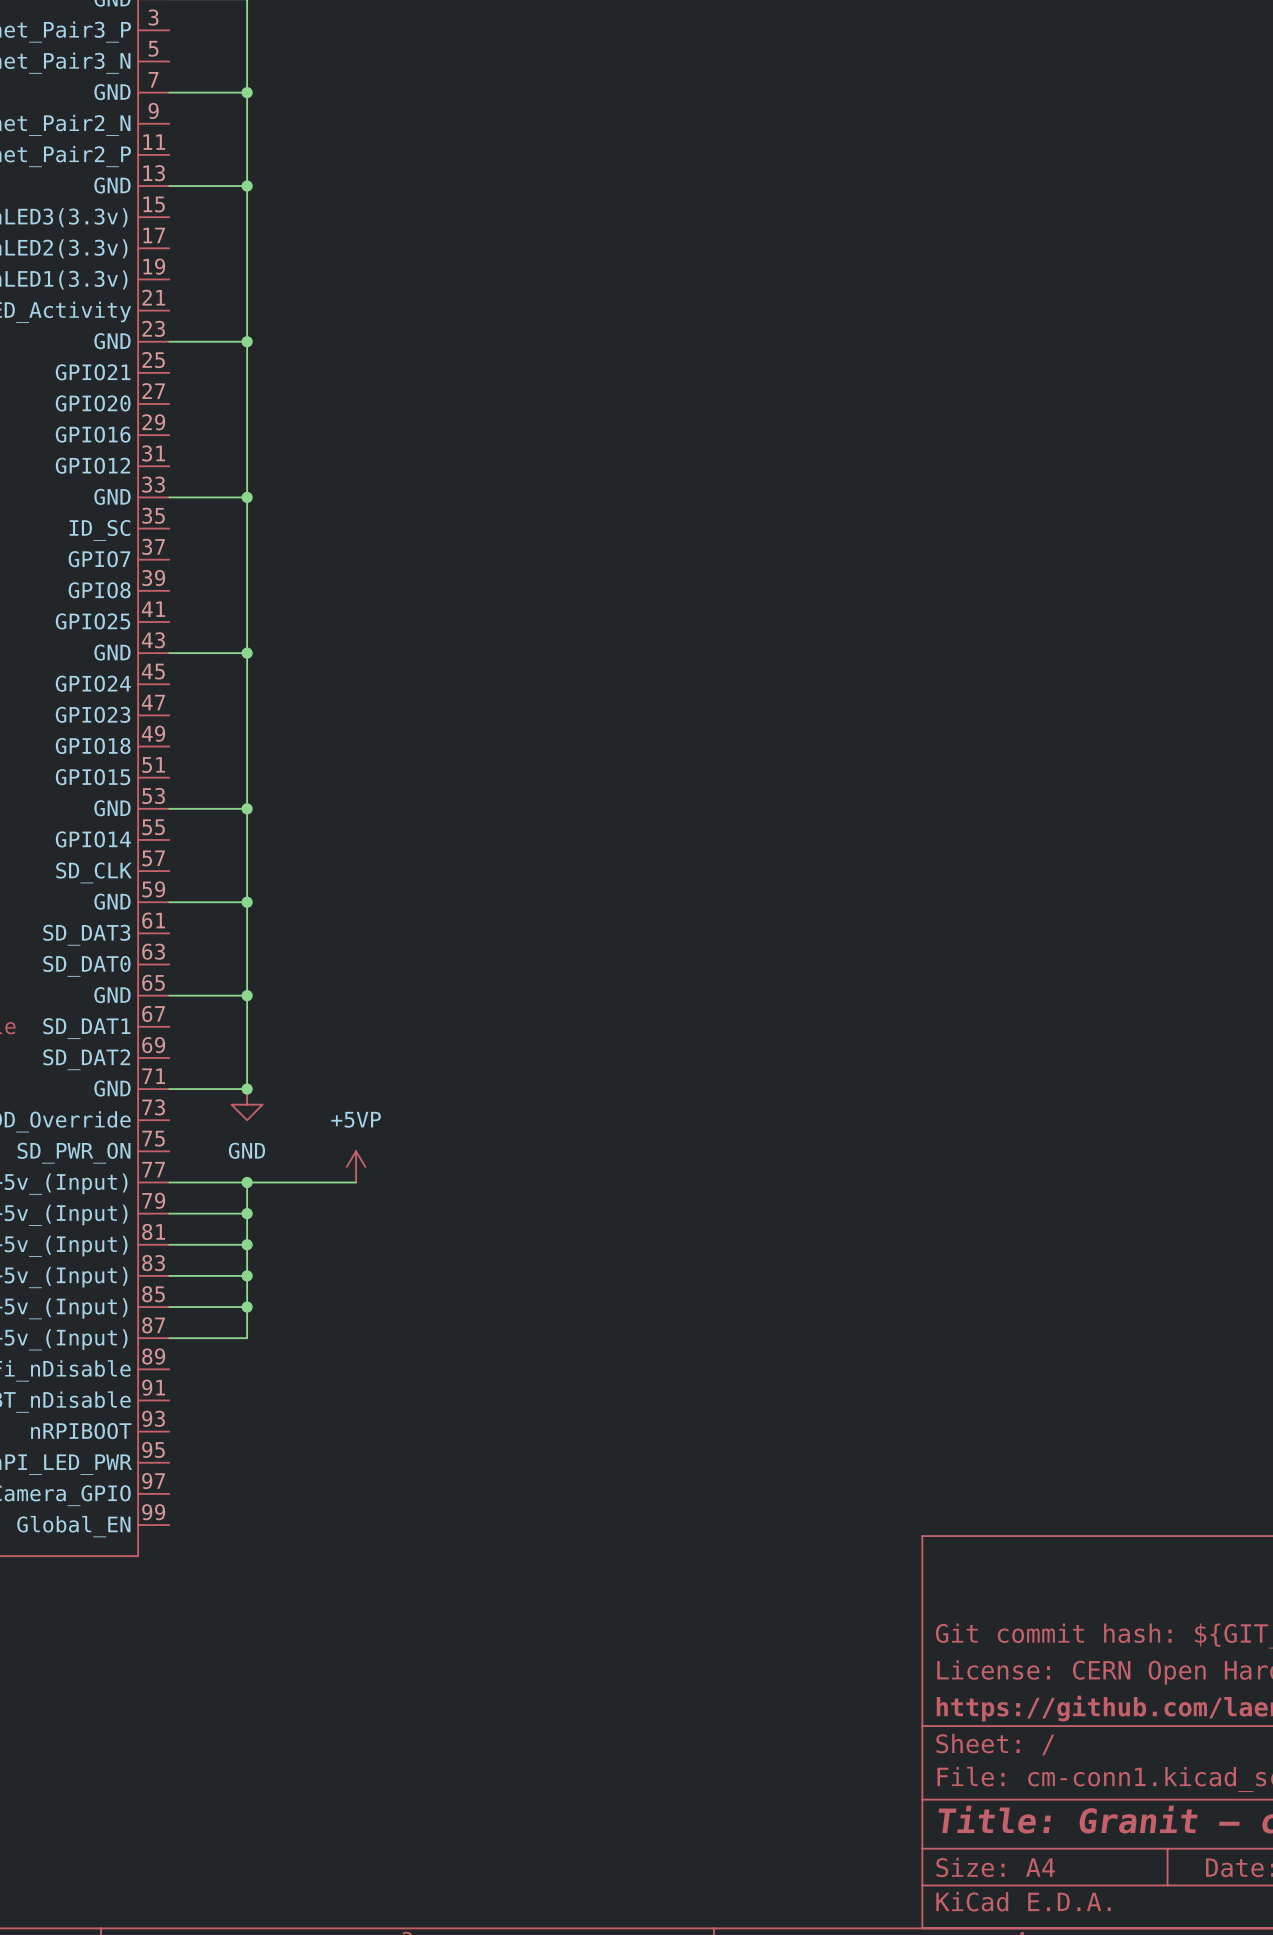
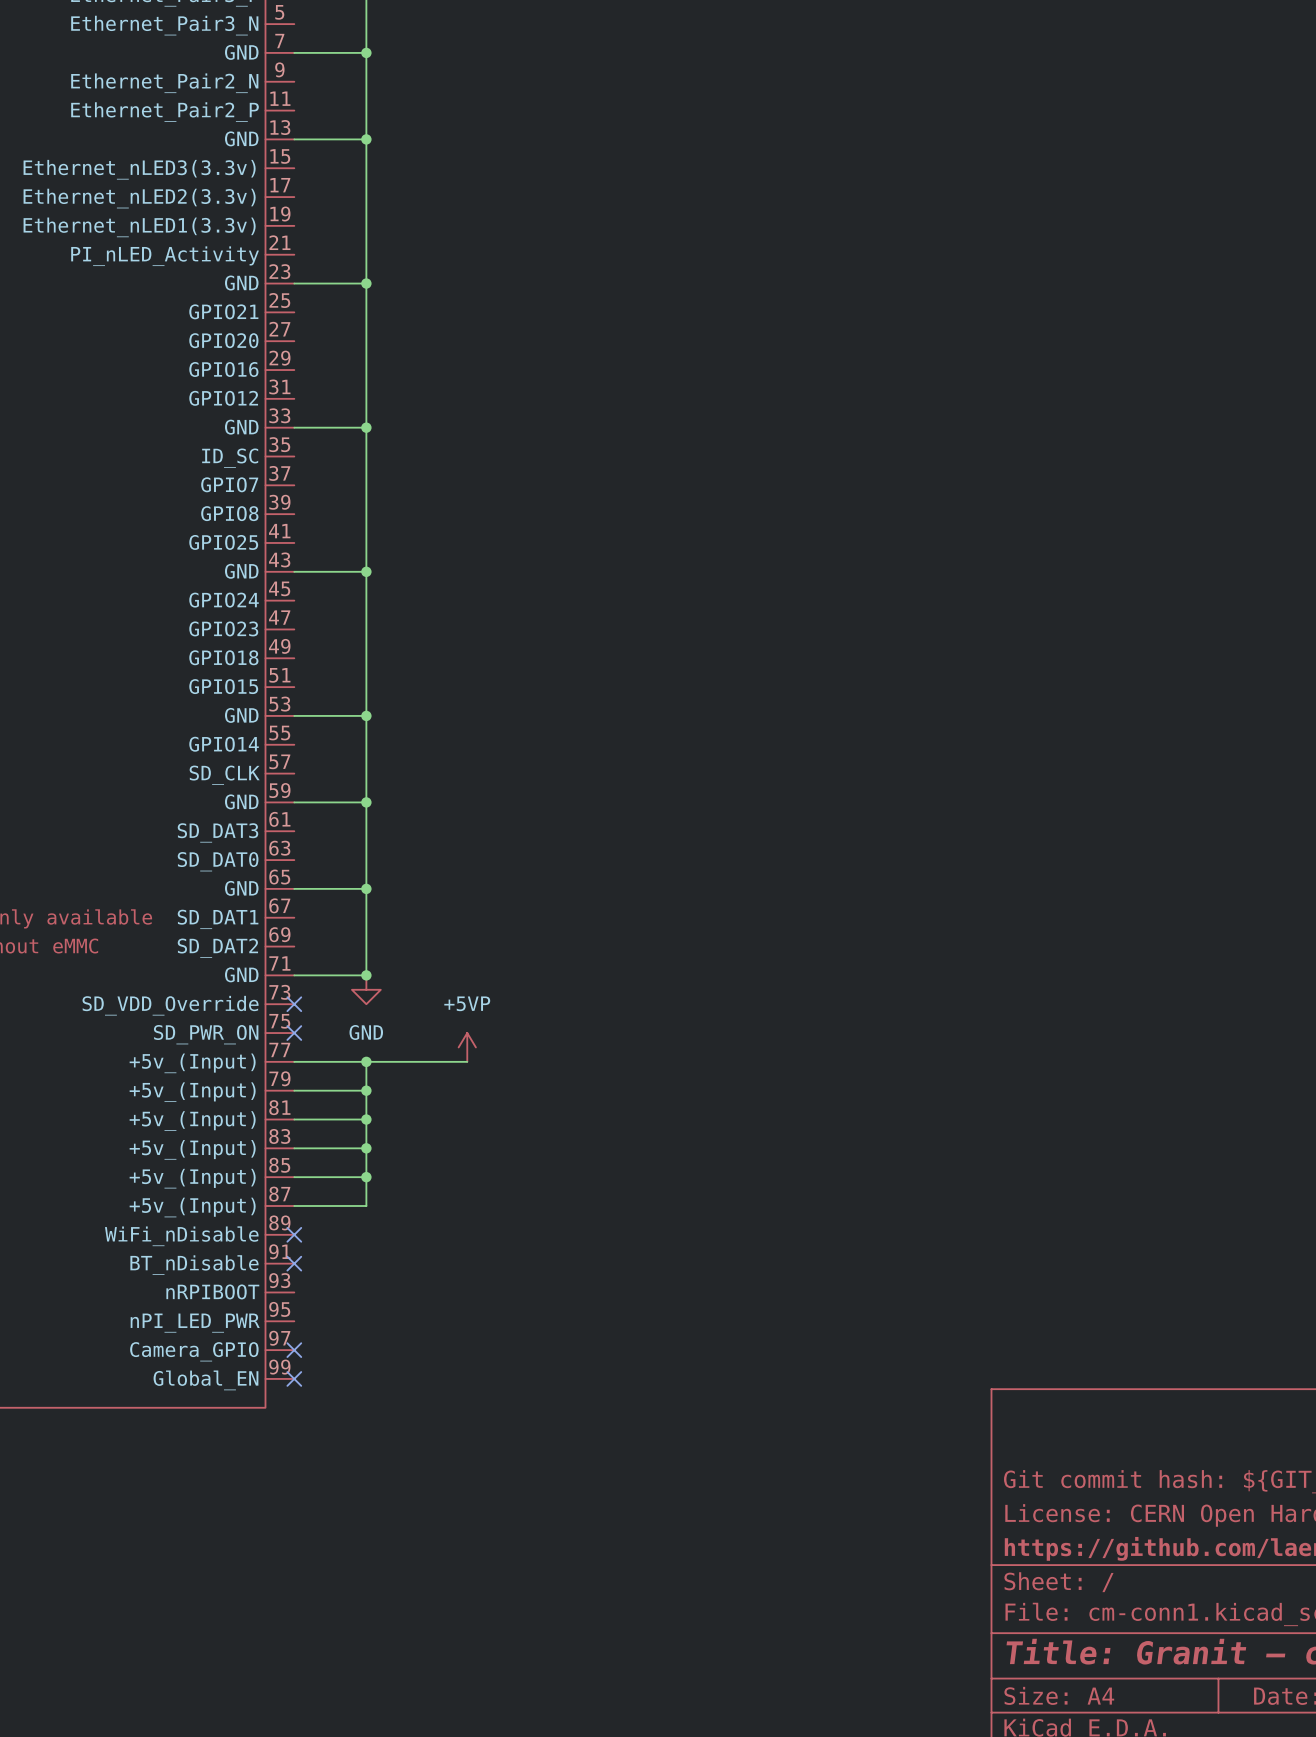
no-connect mark: none -> (294, 1004)
no-connect mark: none -> (294, 1033)
no-connect mark: none -> (294, 1234)
no-connect mark: none -> (294, 1263)
no-connect mark: none -> (294, 1350)
no-connect mark: none -> (294, 1378)

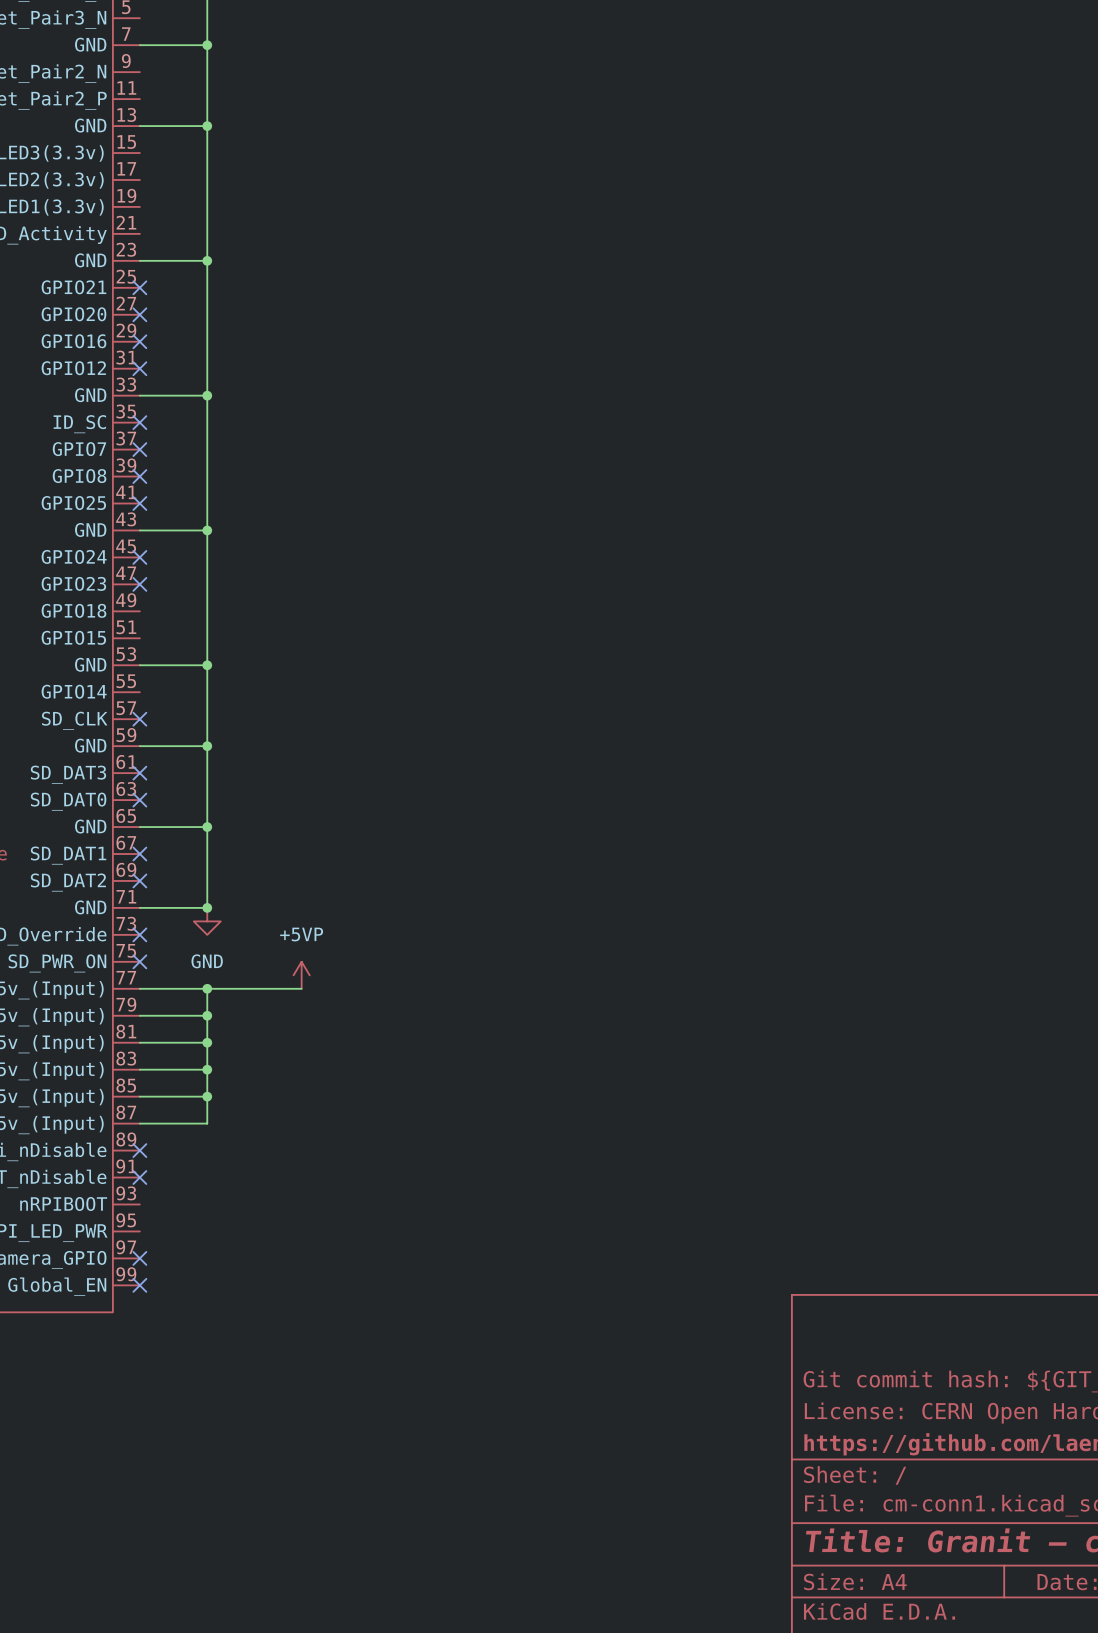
no-connect mark: none -> (139, 287)
no-connect mark: none -> (139, 314)
no-connect mark: none -> (139, 341)
no-connect mark: none -> (139, 368)
no-connect mark: none -> (139, 422)
no-connect mark: none -> (139, 449)
no-connect mark: none -> (139, 476)
no-connect mark: none -> (139, 503)
no-connect mark: none -> (139, 557)
no-connect mark: none -> (139, 584)
no-connect mark: none -> (139, 719)
no-connect mark: none -> (139, 773)
no-connect mark: none -> (139, 800)
no-connect mark: none -> (139, 854)
no-connect mark: none -> (139, 880)

